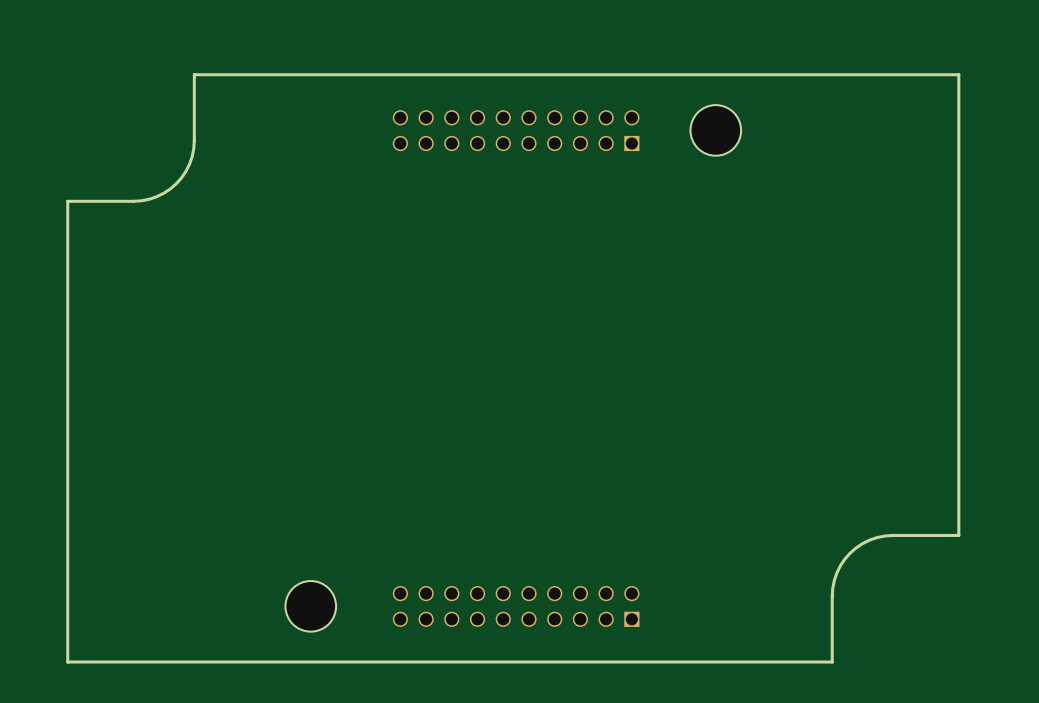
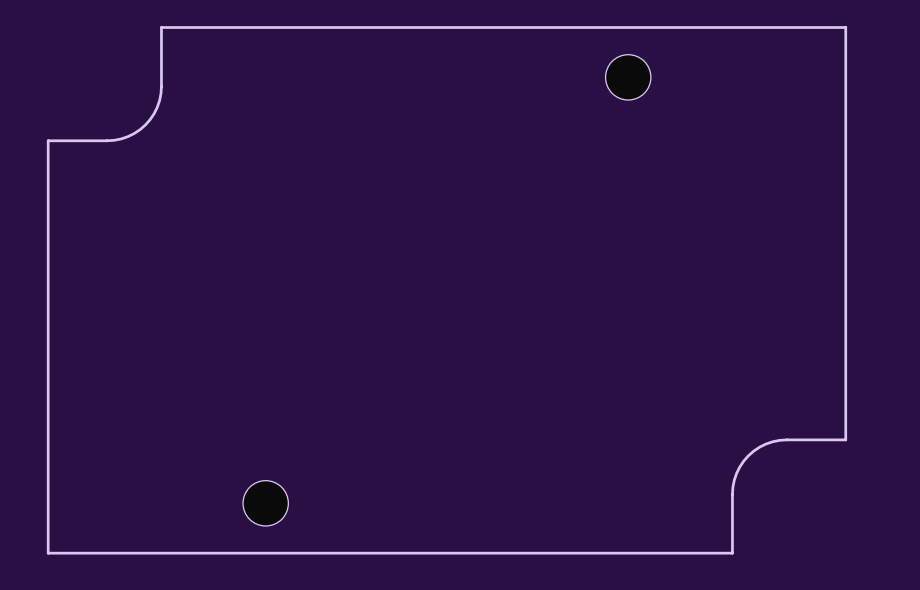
part: (516, 130) -> none
part: (516, 606) -> none

